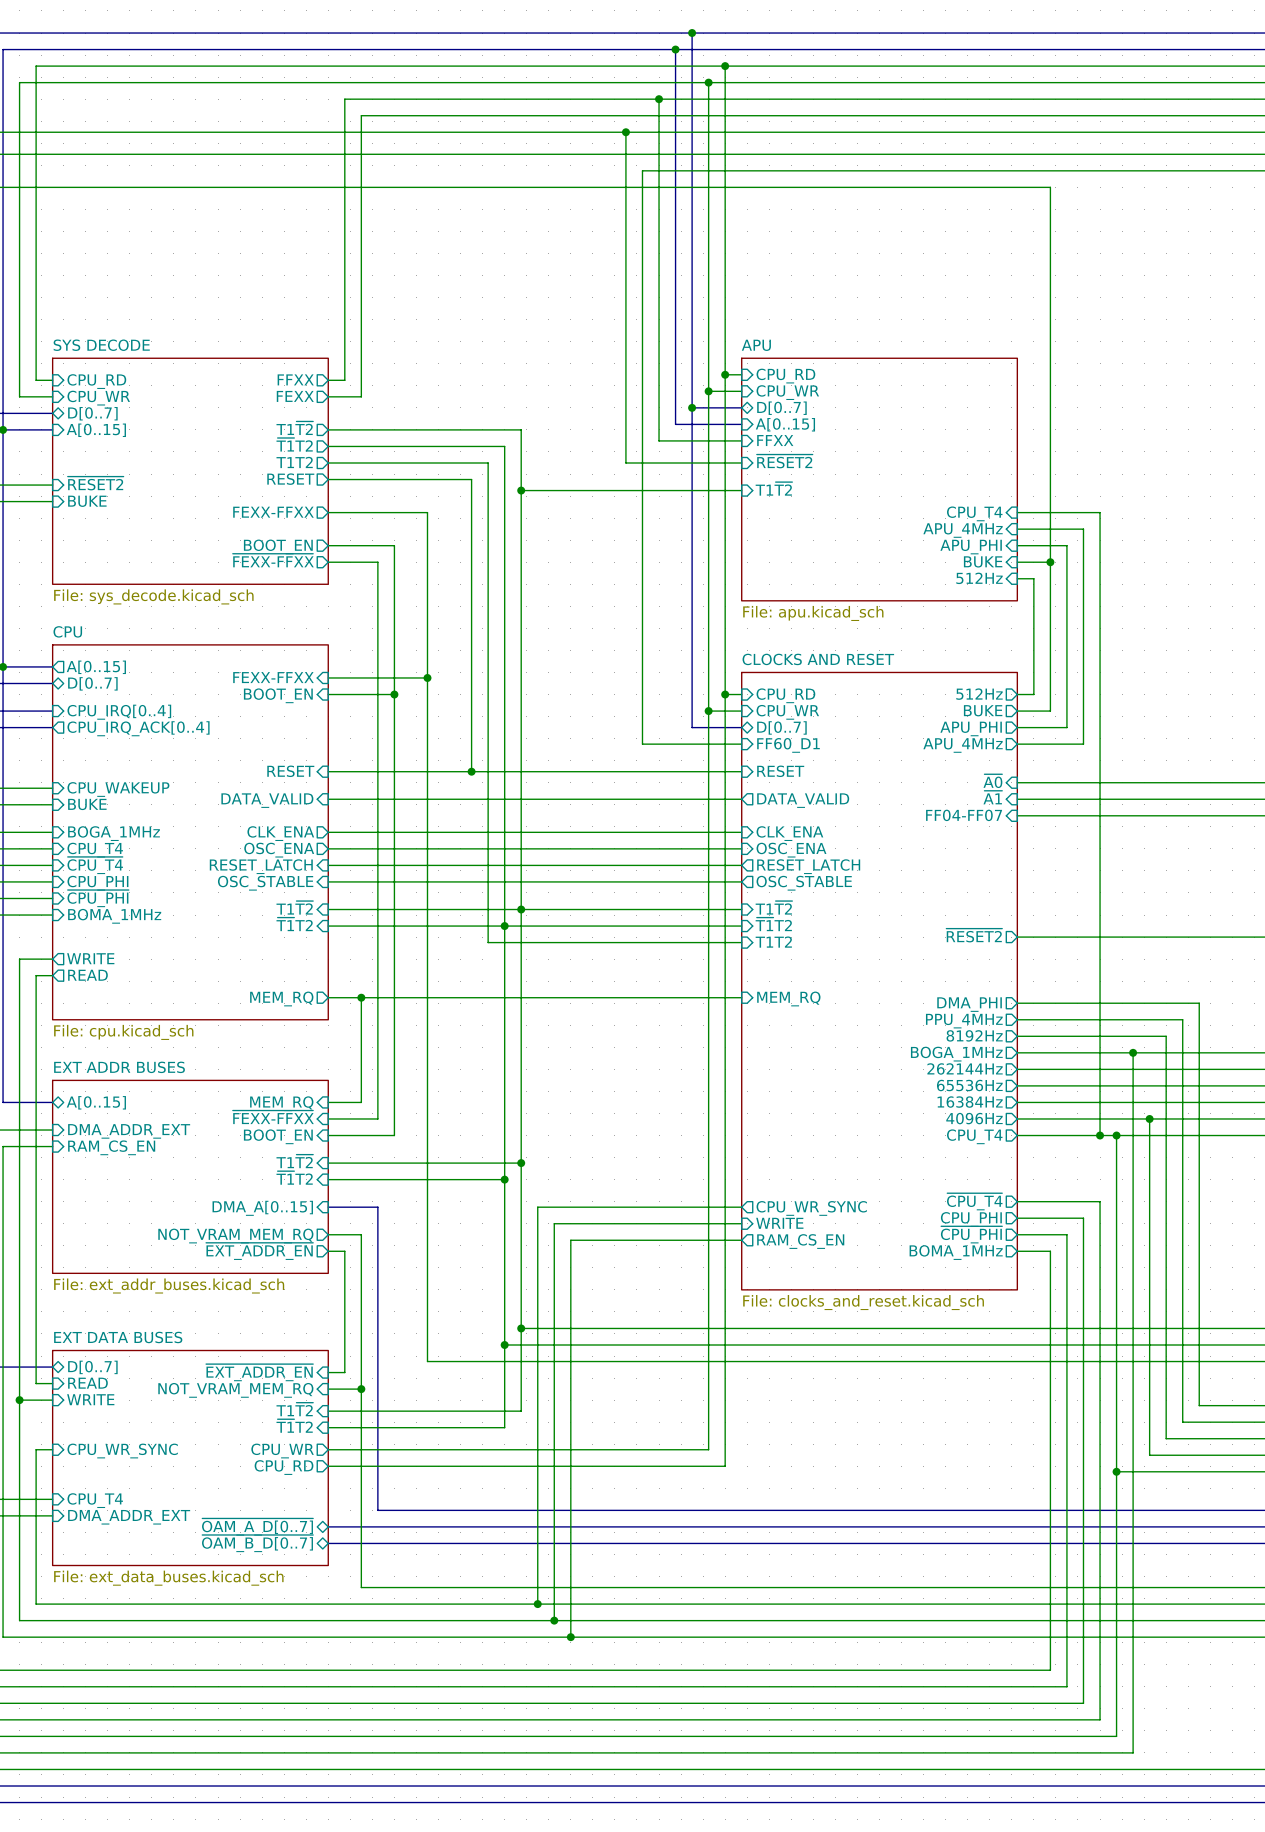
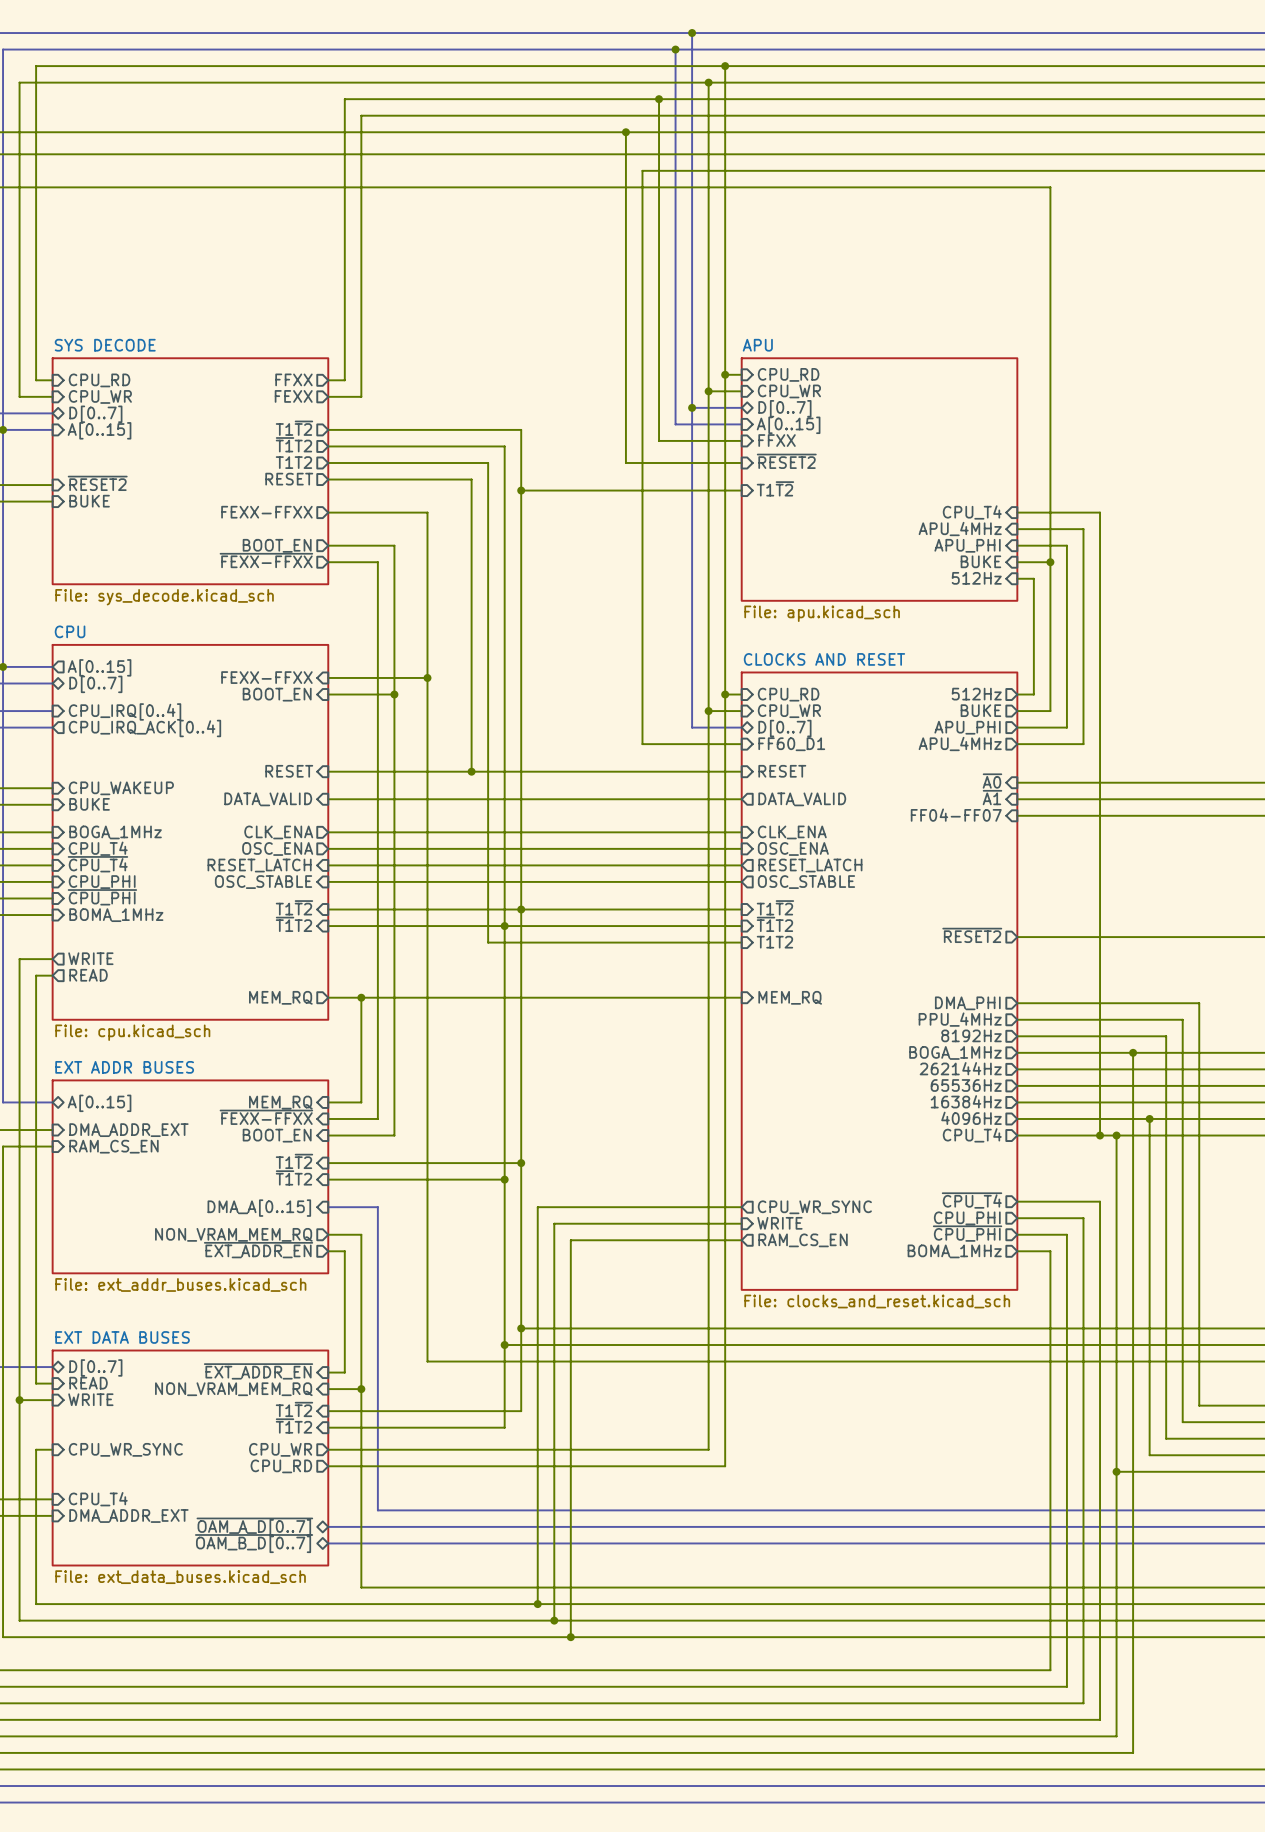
sheet pin: NOT_VRAM_MEM_RQ (235, 1236) -> NON_VRAM_MEM_RQ (233, 1234)
sheet pin: NOT_VRAM_MEM_RQ (235, 1390) -> NON_VRAM_MEM_RQ (233, 1389)

